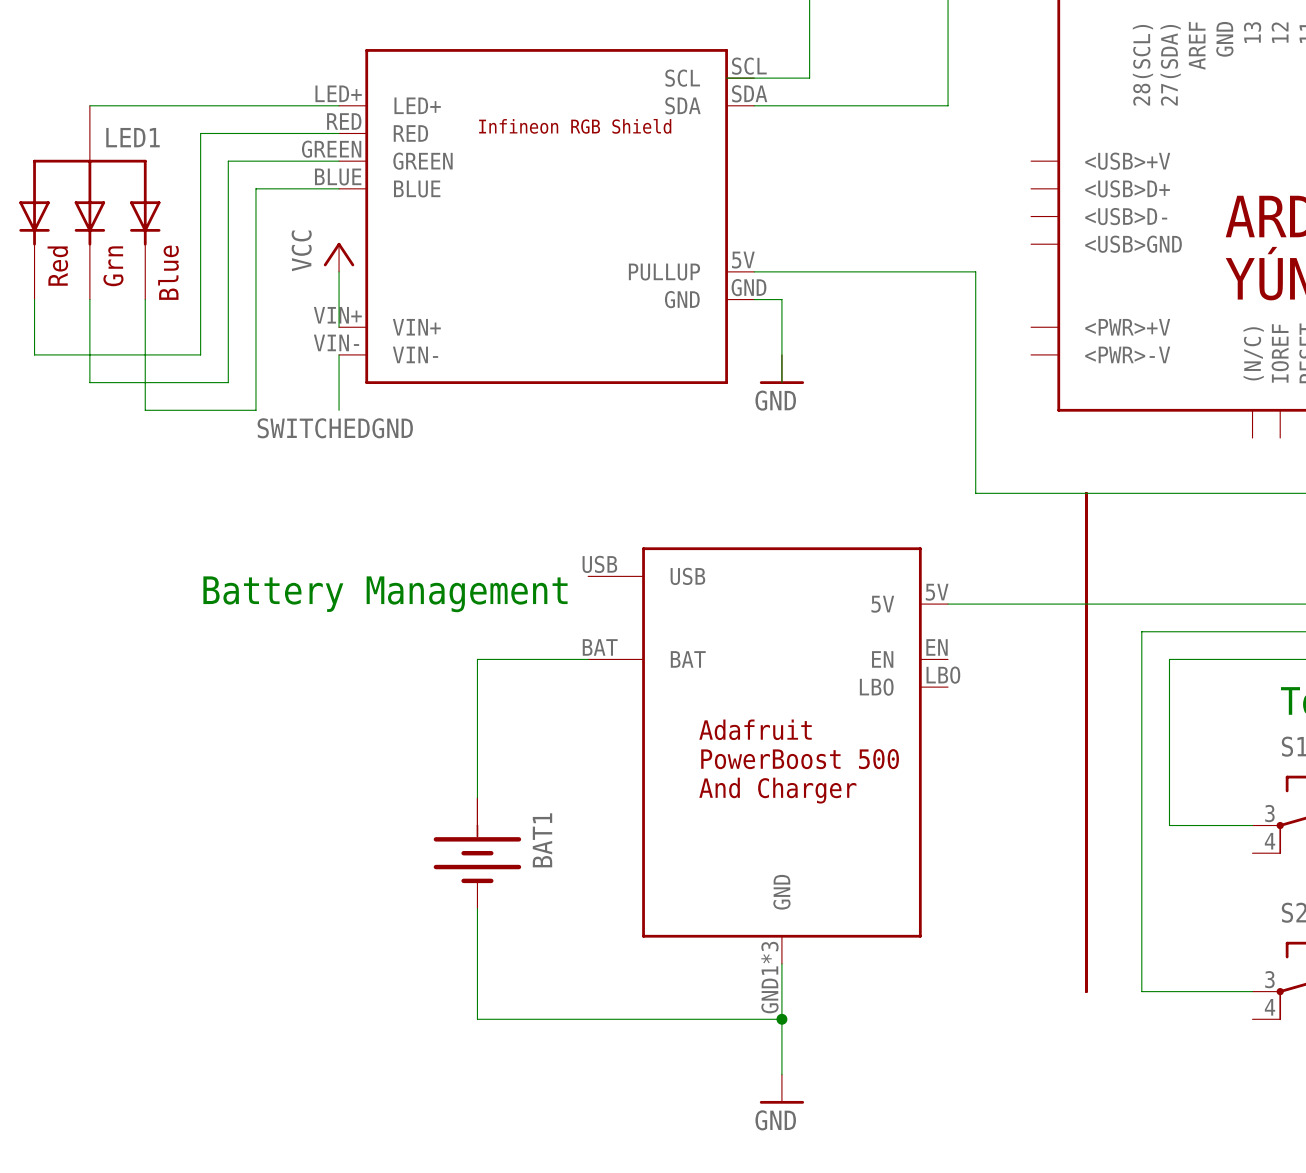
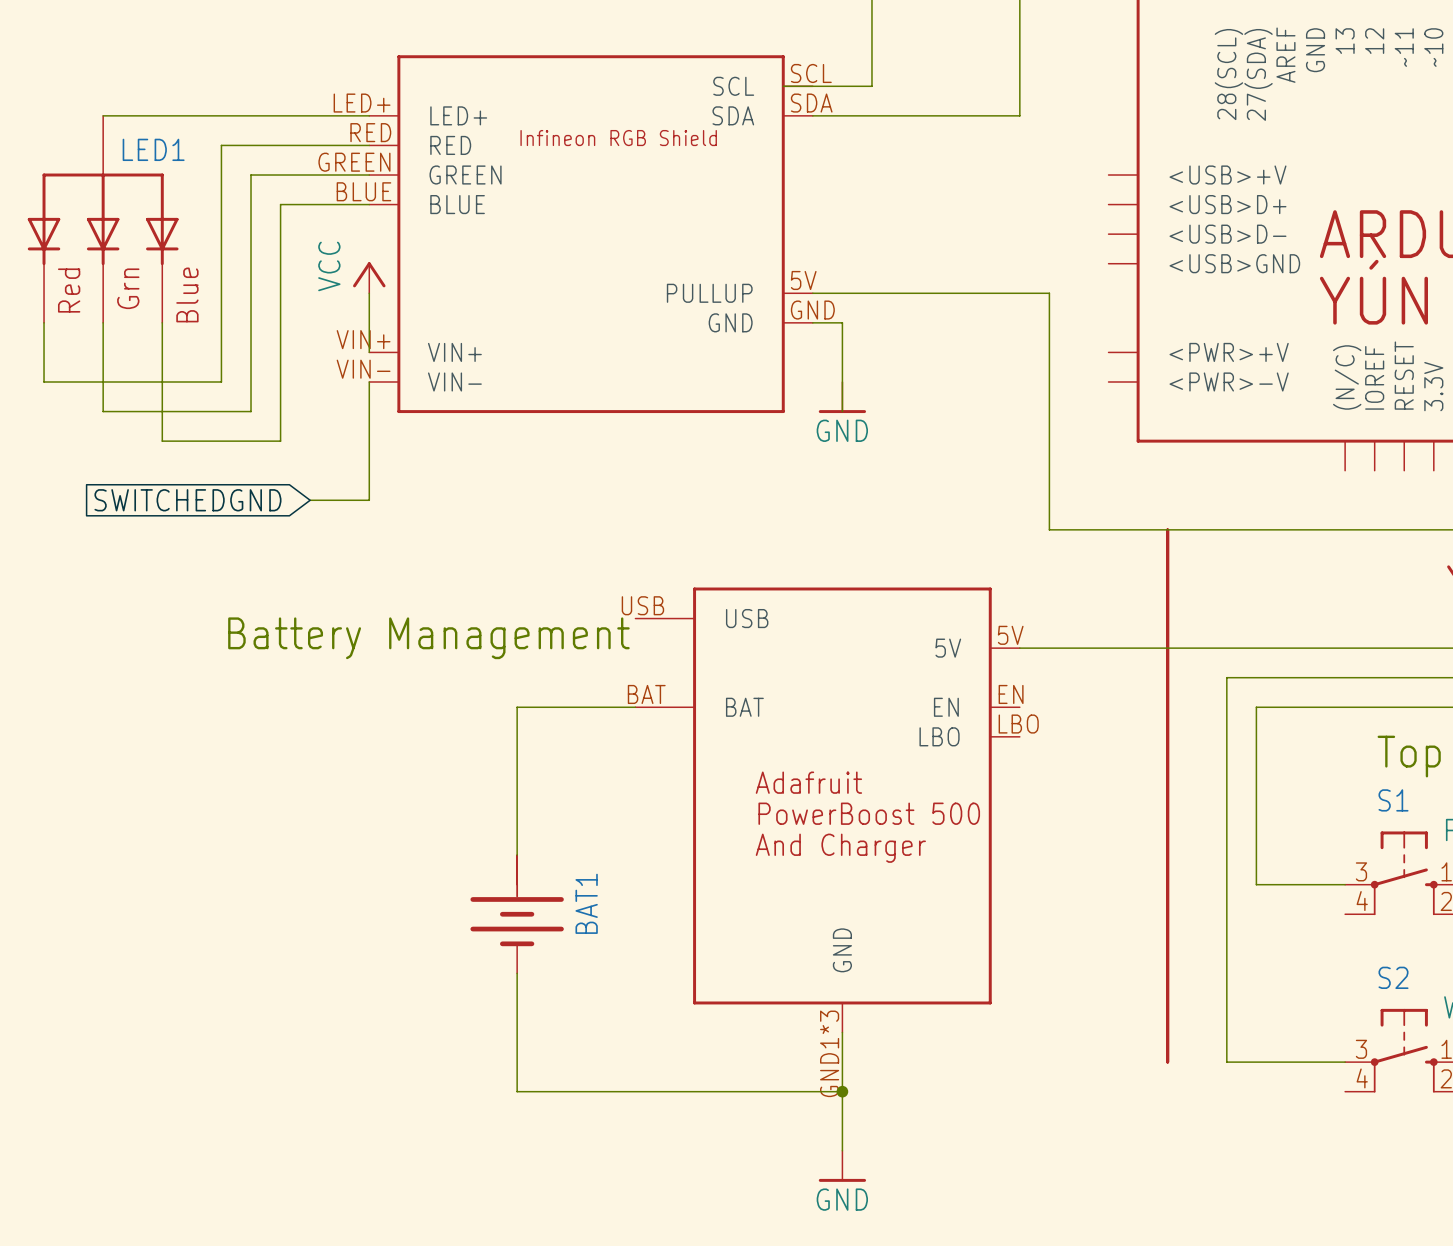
wire: none -> (369, 441) (369, 500) (310, 500)
label: SWITCHEDGND (335, 428) -> none
global label: none -> SWITCHEDGND (187, 500)

